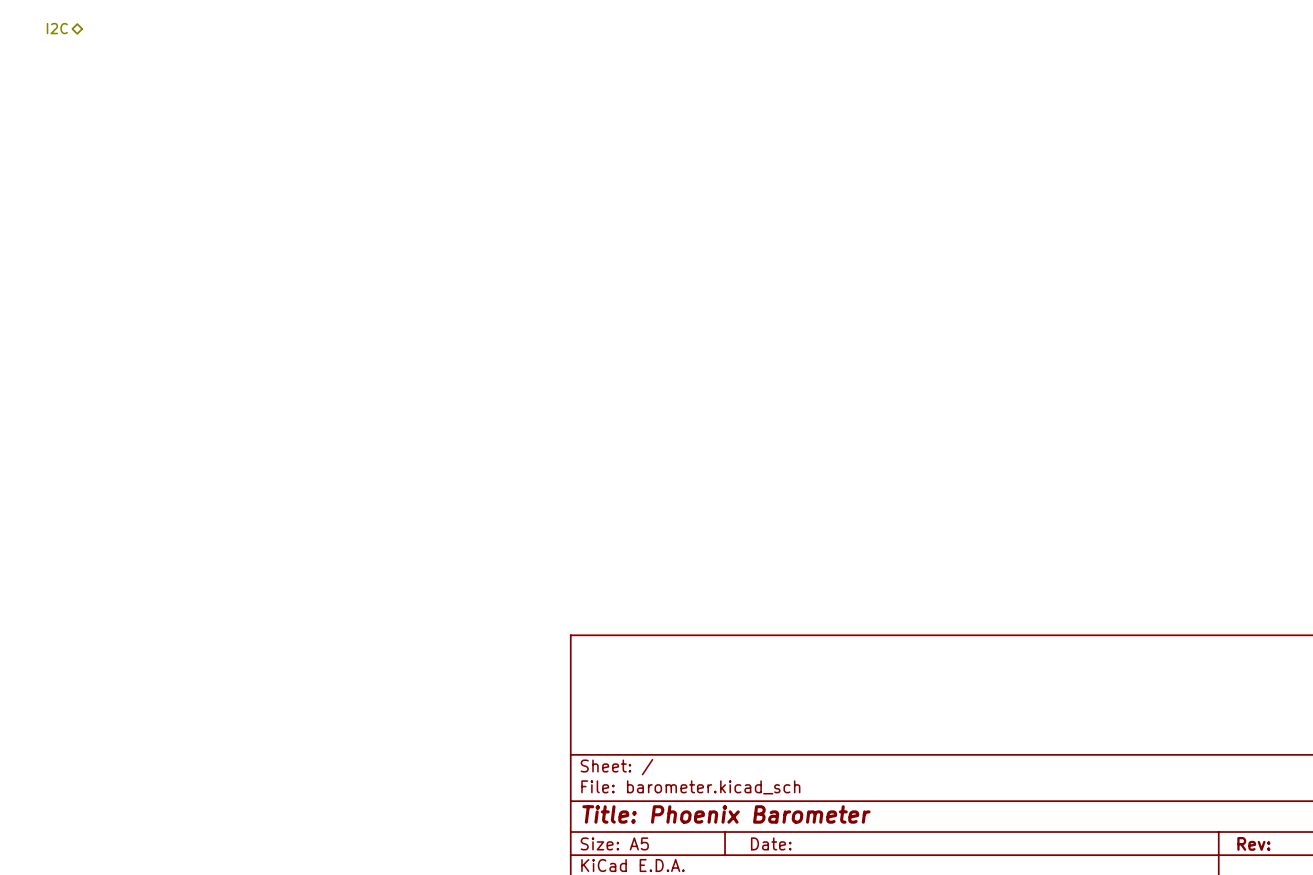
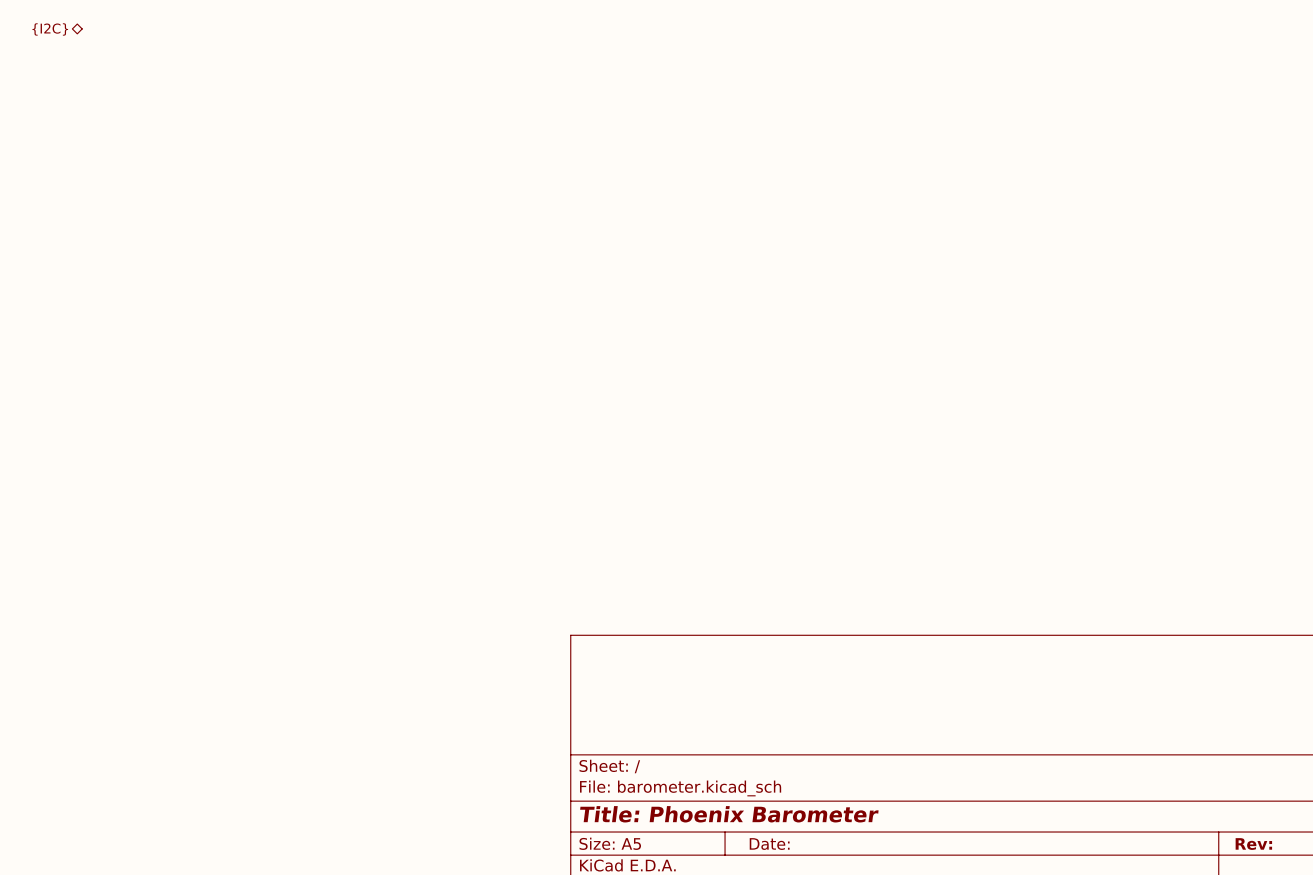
hierarchical label: I2C (57, 28) -> {I2C} (50, 29)

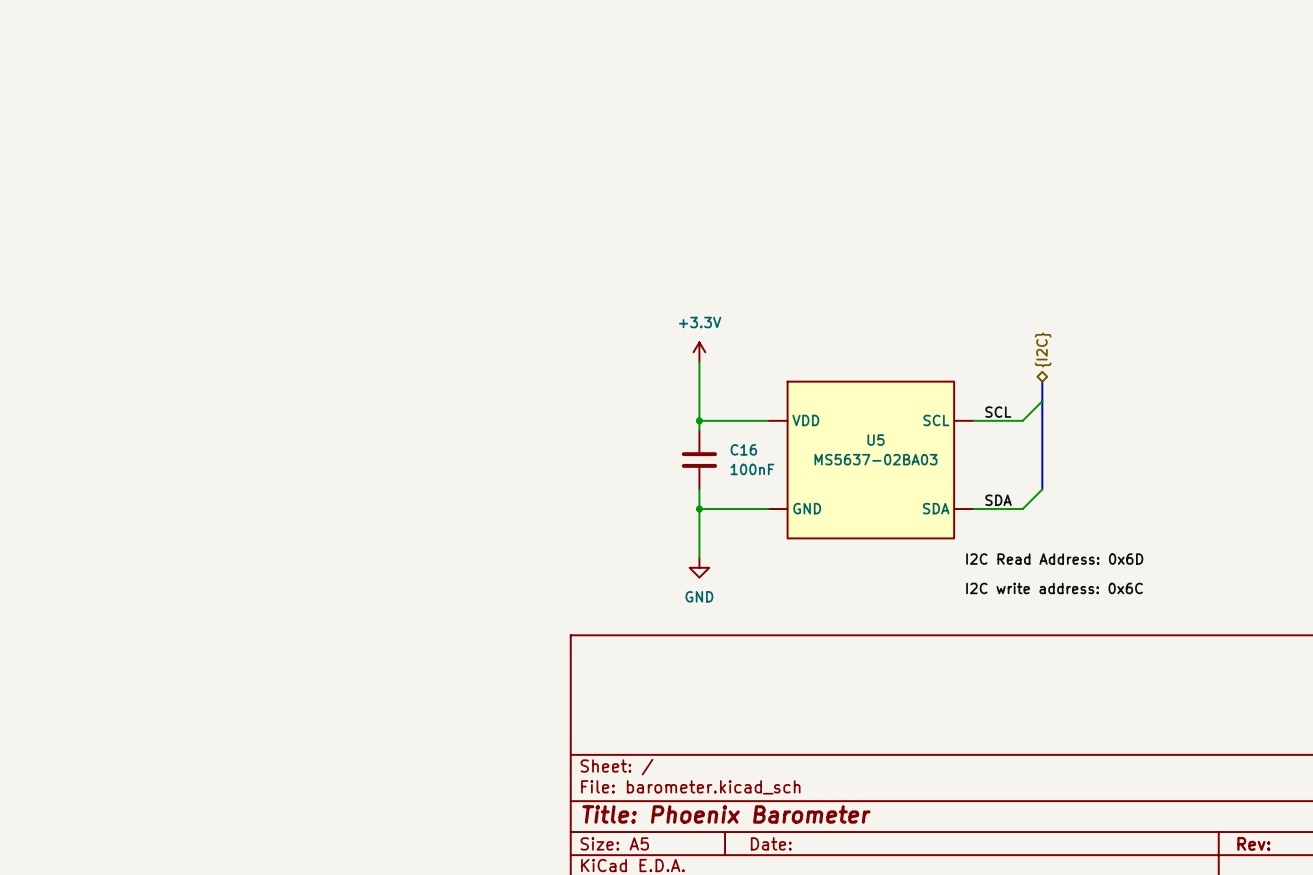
hierarchical label: {I2C} (50, 29) -> none
hierarchical label: none -> {I2C} (1043, 350)
power symbol: none -> +3.3V (699, 352)
wire: none -> (699, 362) (699, 430)
bus: none -> (1042, 381) (1042, 489)
wire: none -> (1042, 401) (1022, 420) (973, 420)
label: none -> SCL (998, 412)
wire: none -> (699, 420) (768, 420)
junction: none -> (699, 420)
C16: none -> 100nF (699, 460)
U5: none -> MS5637-02BA03 (885, 460)
wire: none -> (699, 489) (699, 557)
wire: none -> (1042, 489) (1022, 509) (973, 509)
label: none -> SDA (998, 500)
wire: none -> (699, 509) (768, 509)
junction: none -> (699, 509)
label: none -> I2C Read Address: 0x6D (1054, 559)
power symbol: none -> GND (699, 567)
label: none -> I2C write address: 0x6C (1054, 588)

